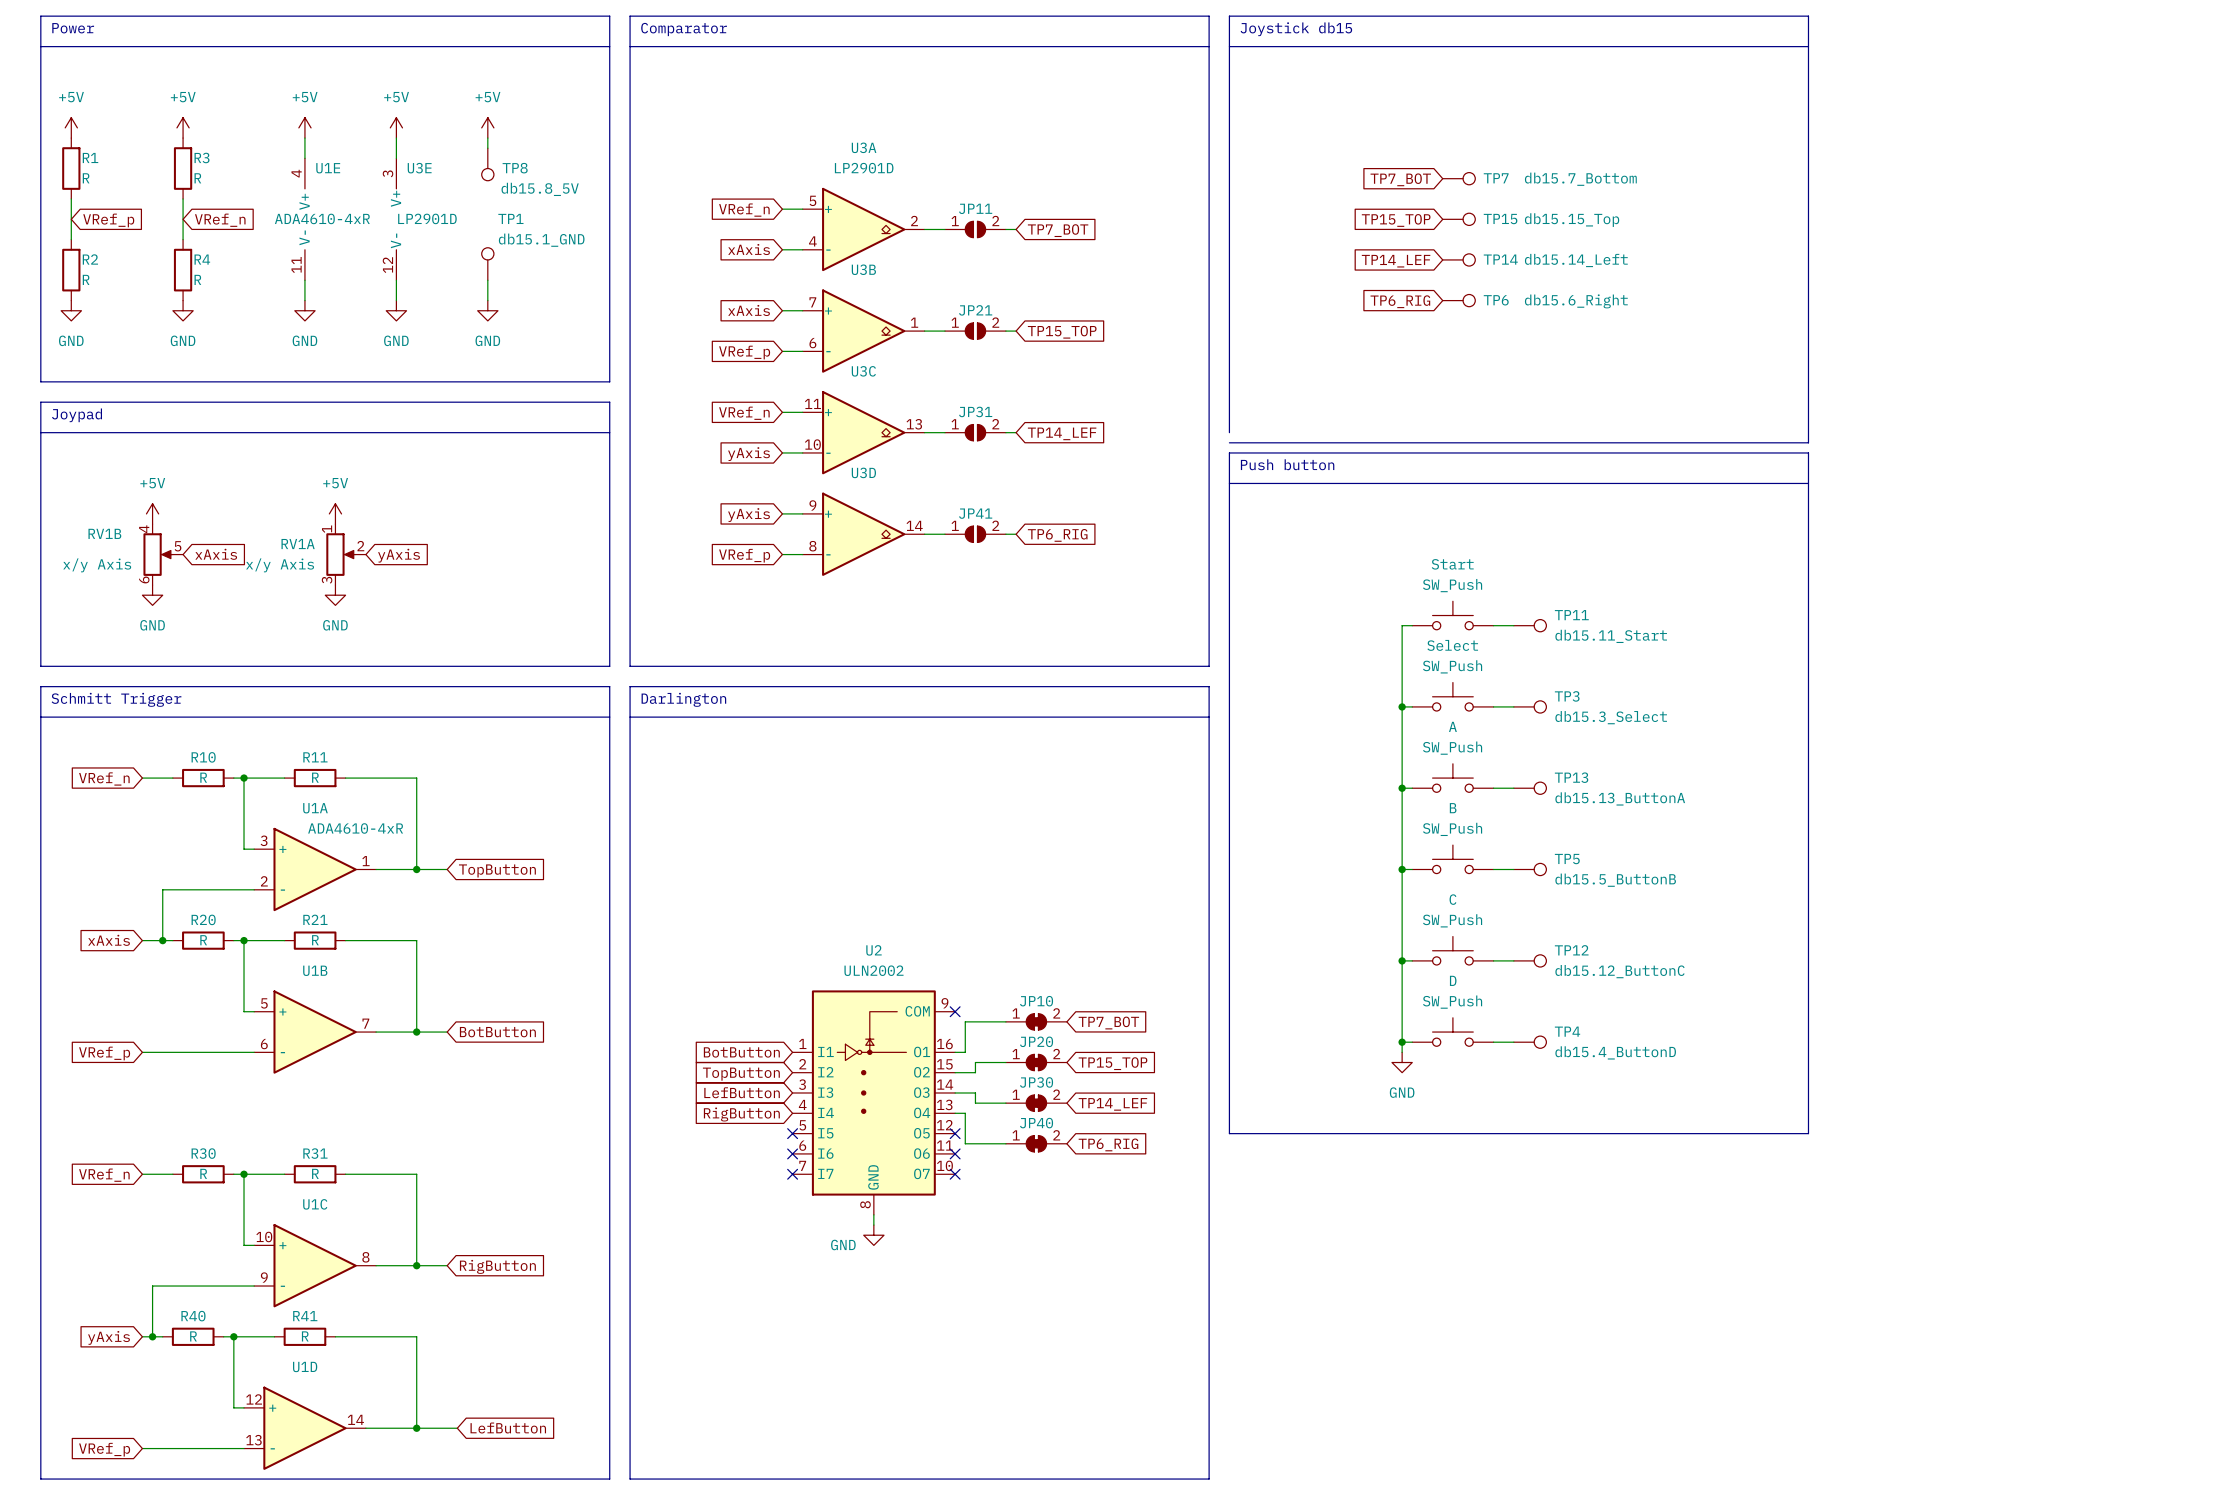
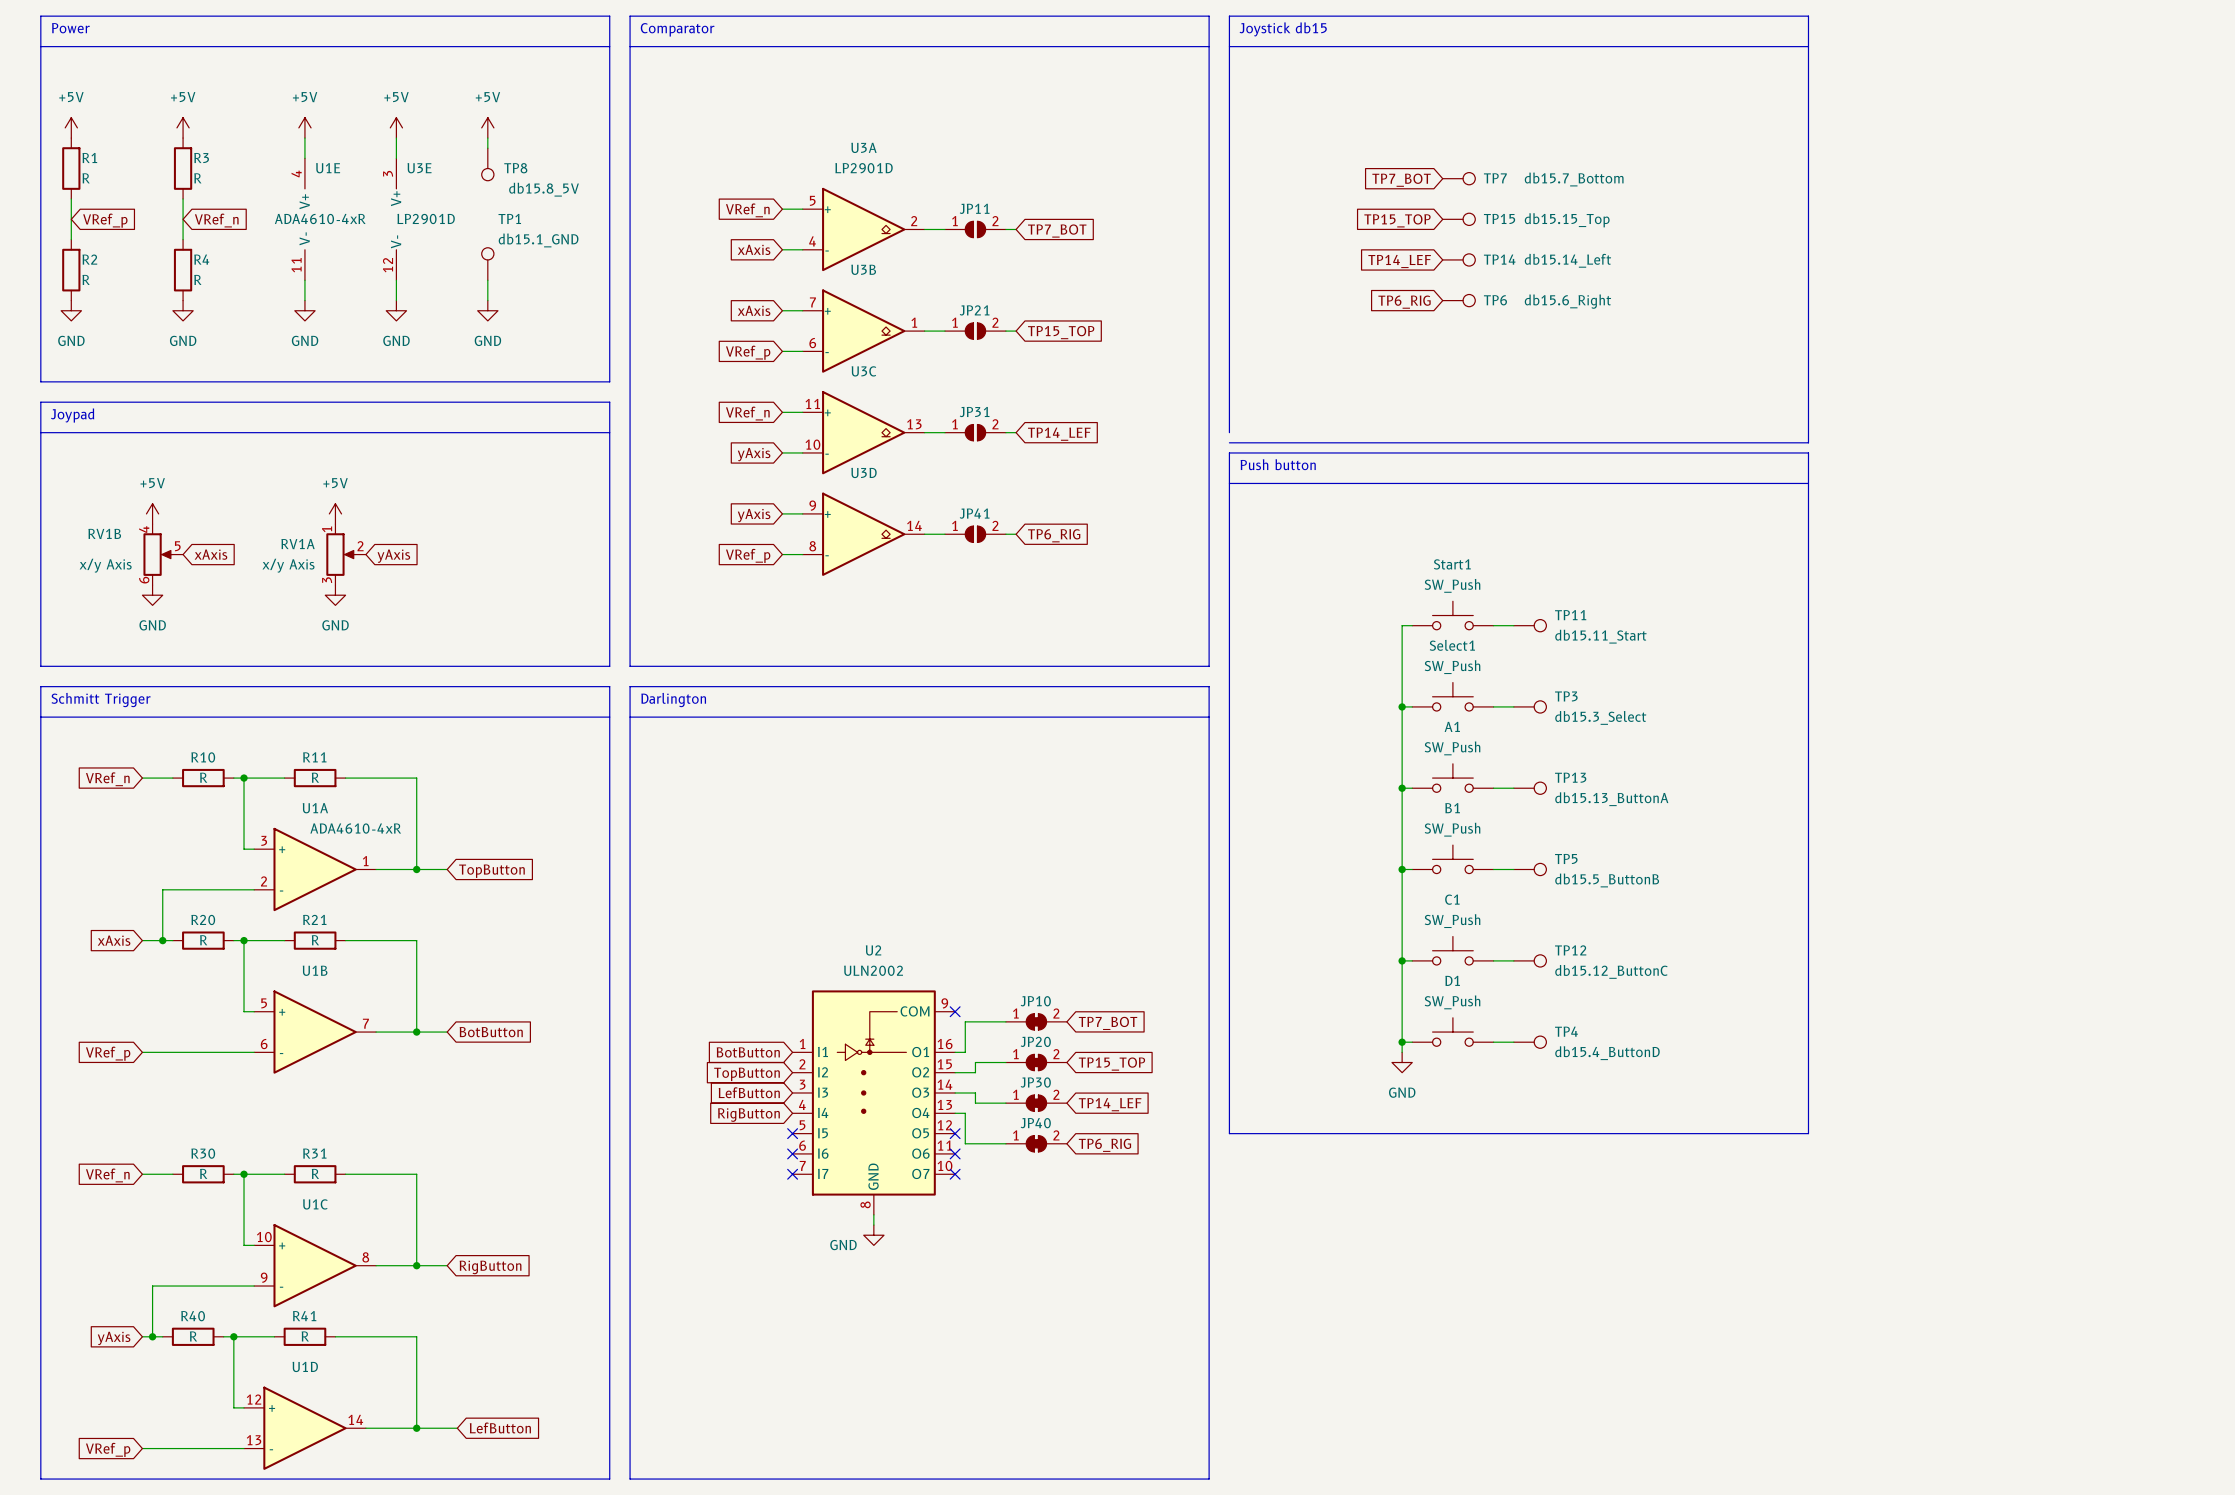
Start name: Start (1452, 564) -> Start1 (1452, 564)
Select name: Select (1452, 645) -> Select1 (1452, 645)
A name: A (1452, 726) -> A1 (1452, 726)
B name: B (1453, 808) -> B1 (1452, 808)
C name: C (1452, 899) -> C1 (1452, 899)
D name: D (1453, 980) -> D1 (1452, 980)

